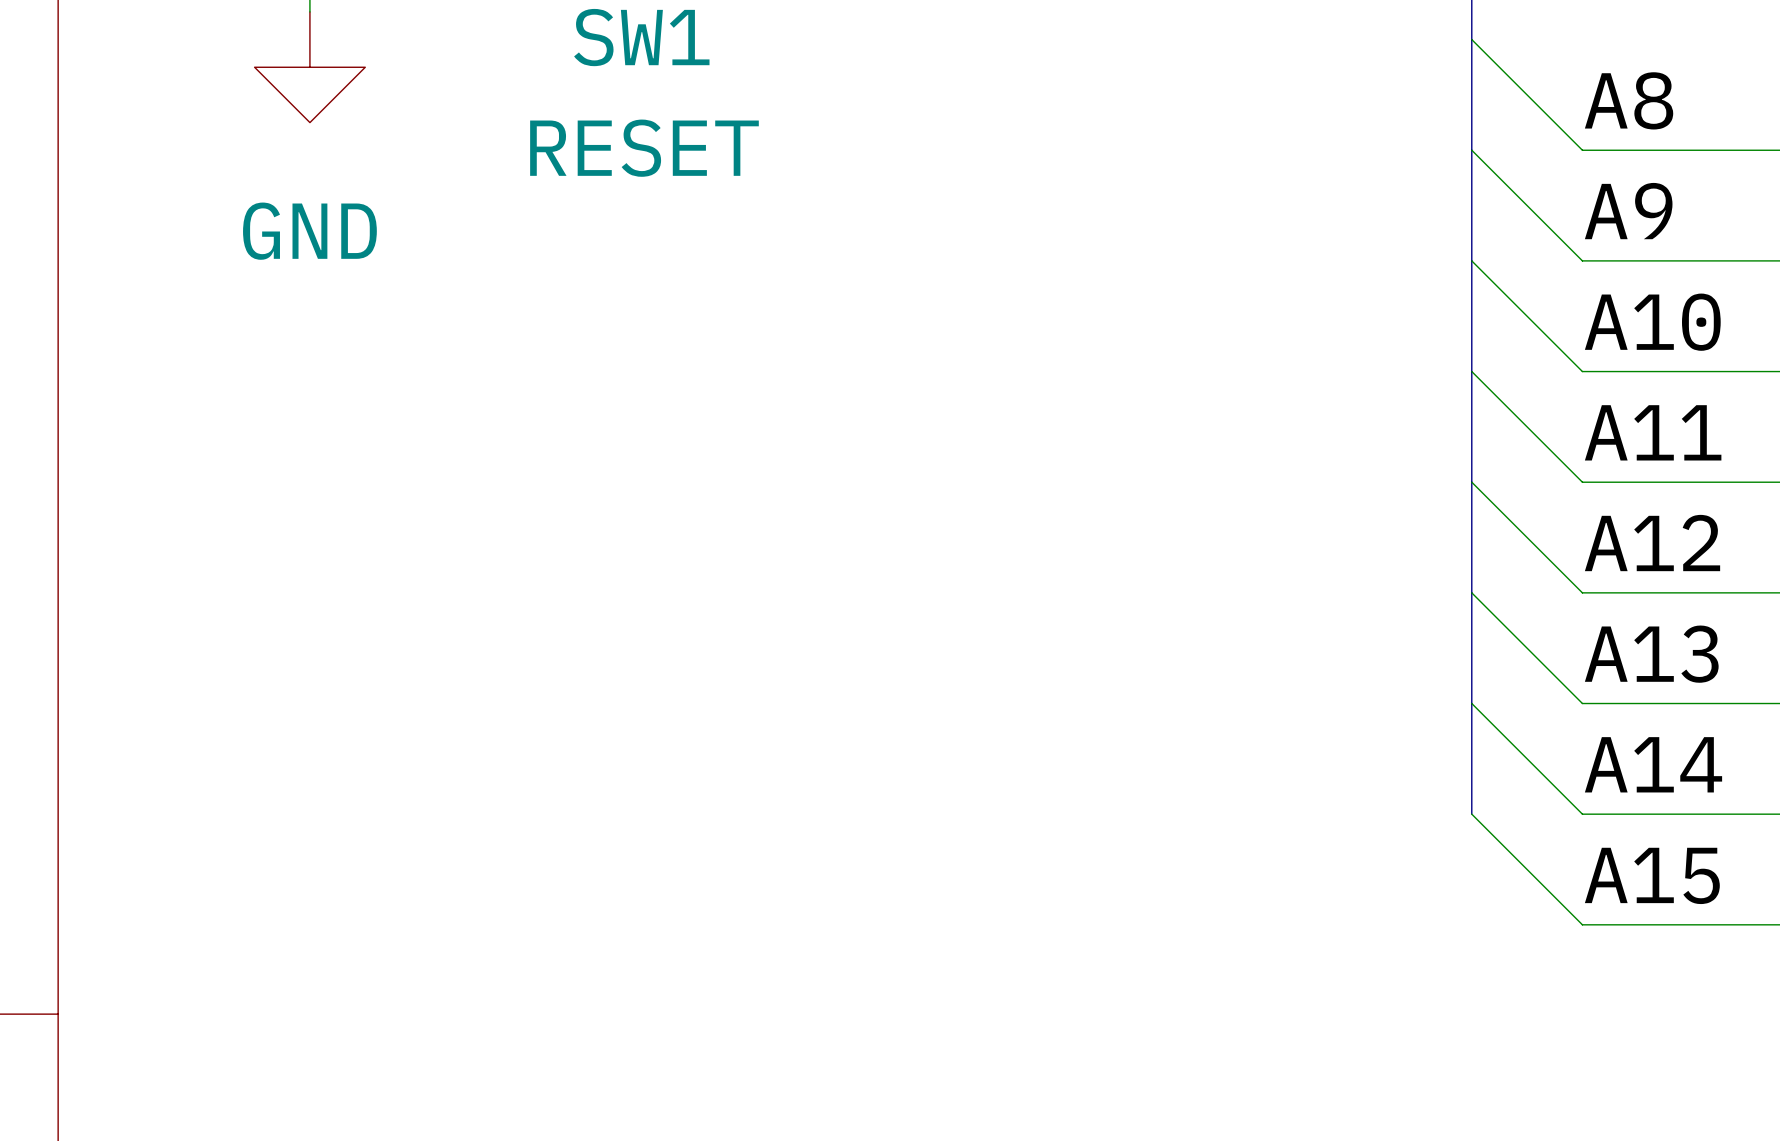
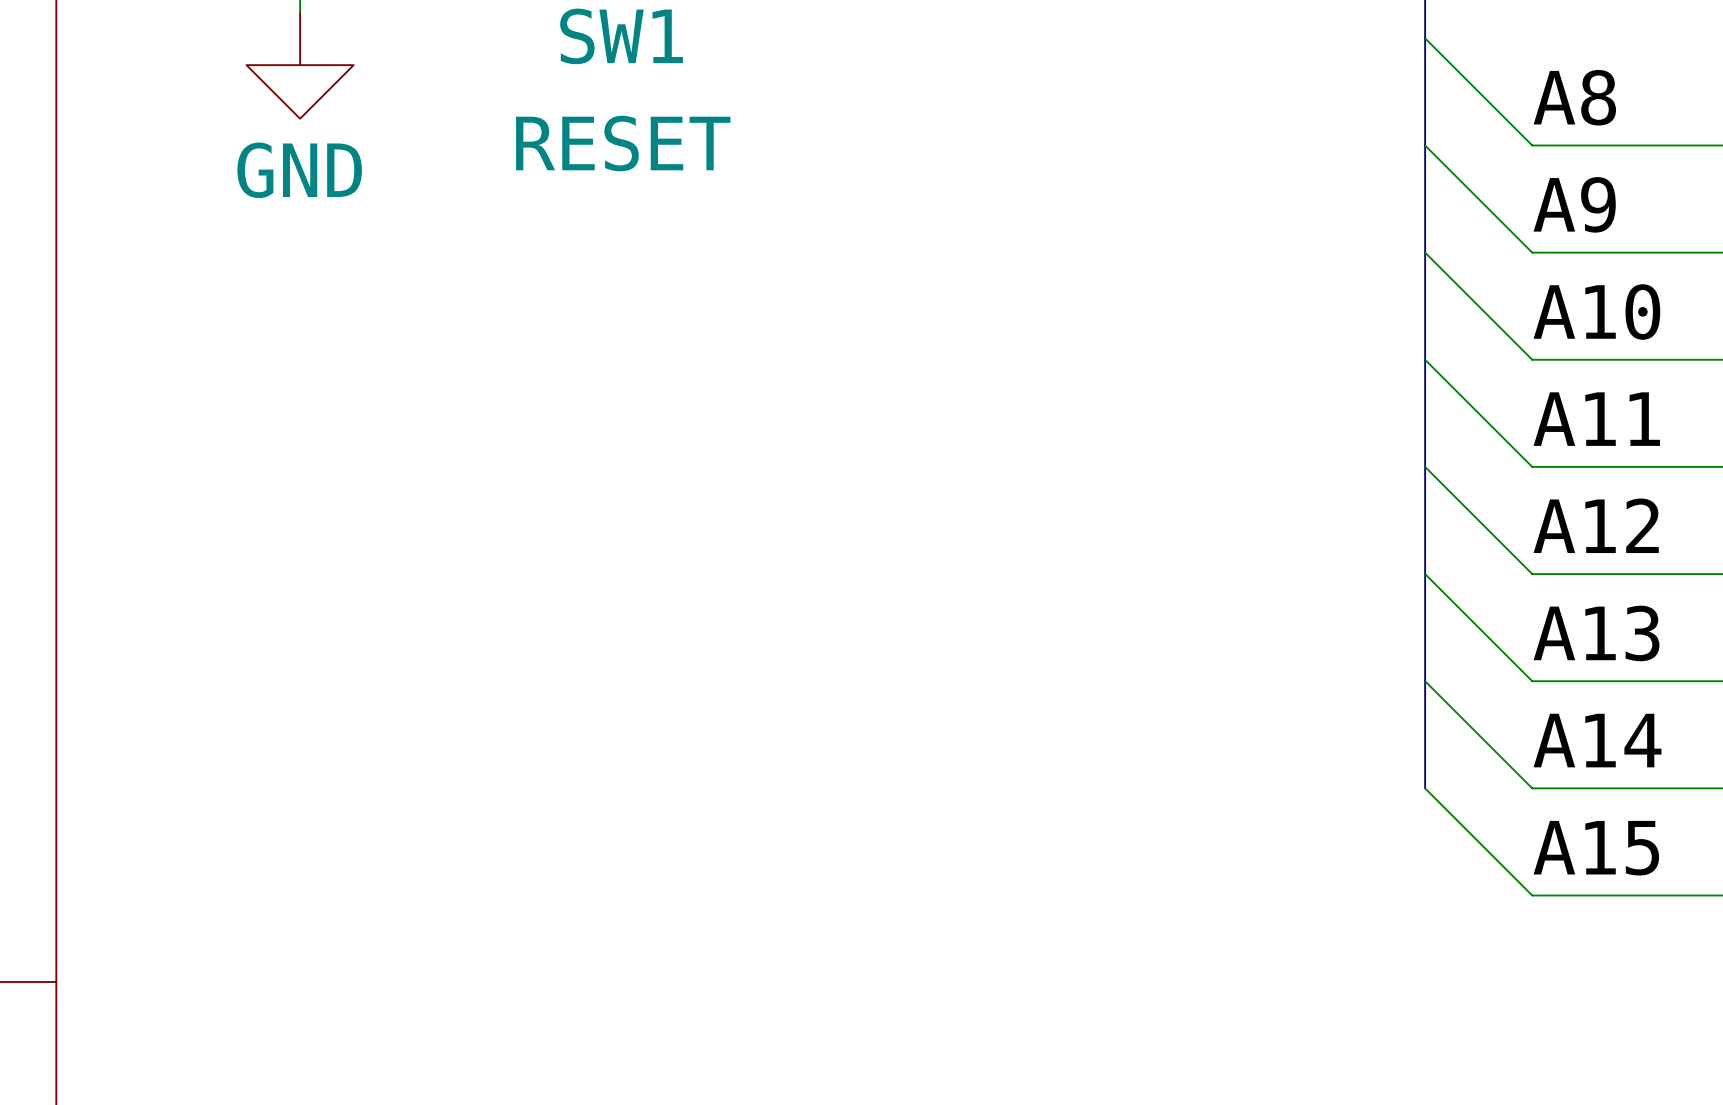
power symbol text position: GND (309, 231) -> GND (299, 170)

